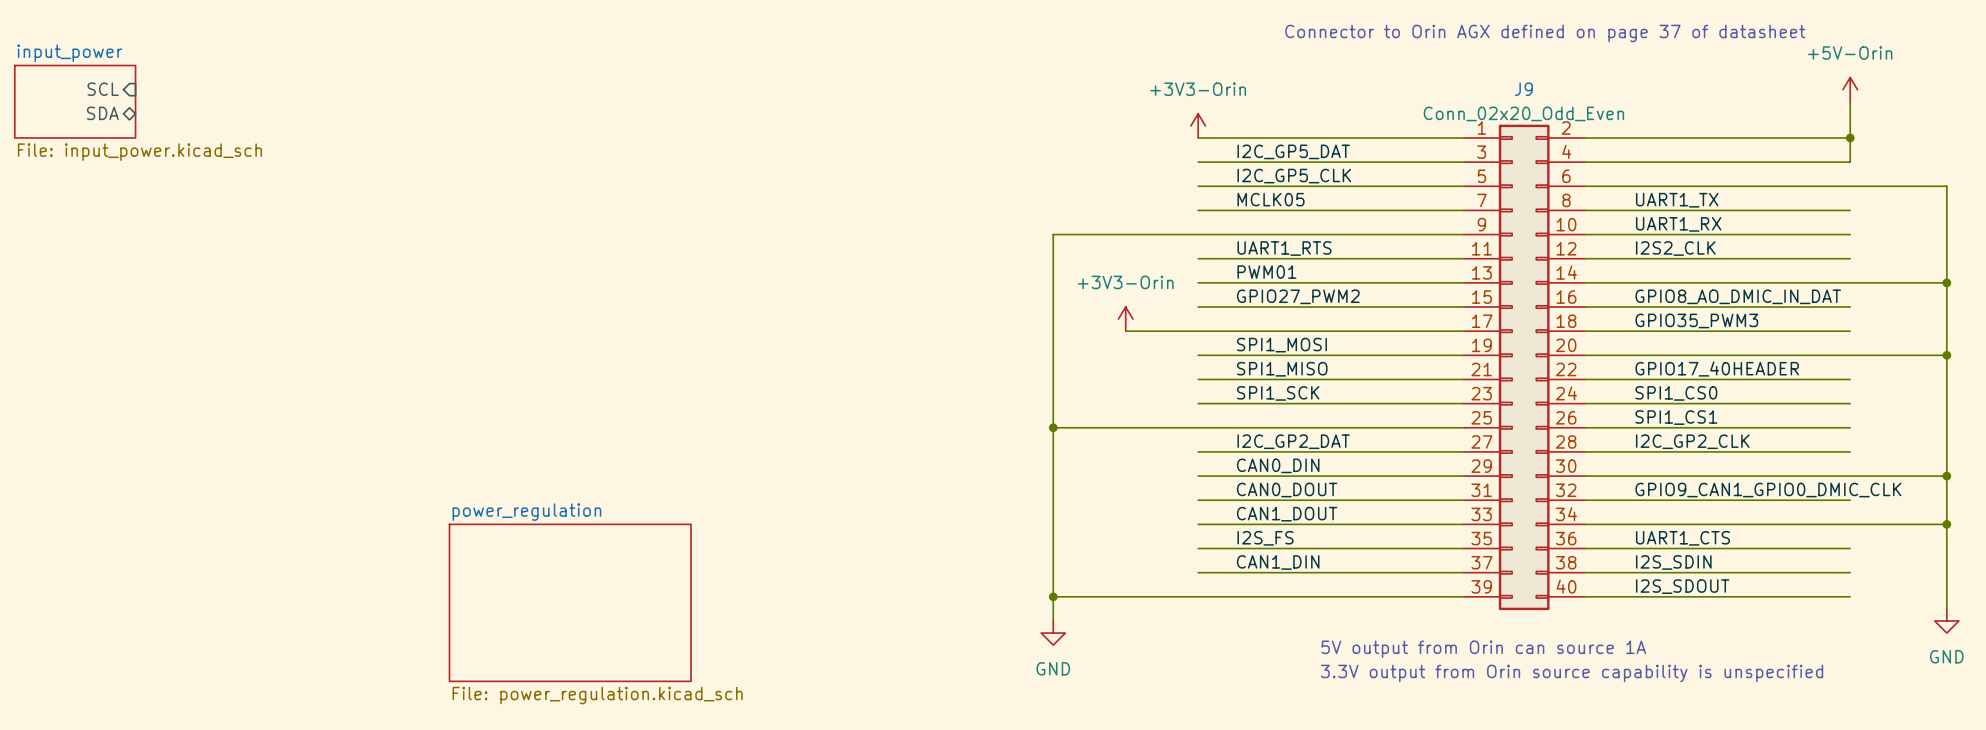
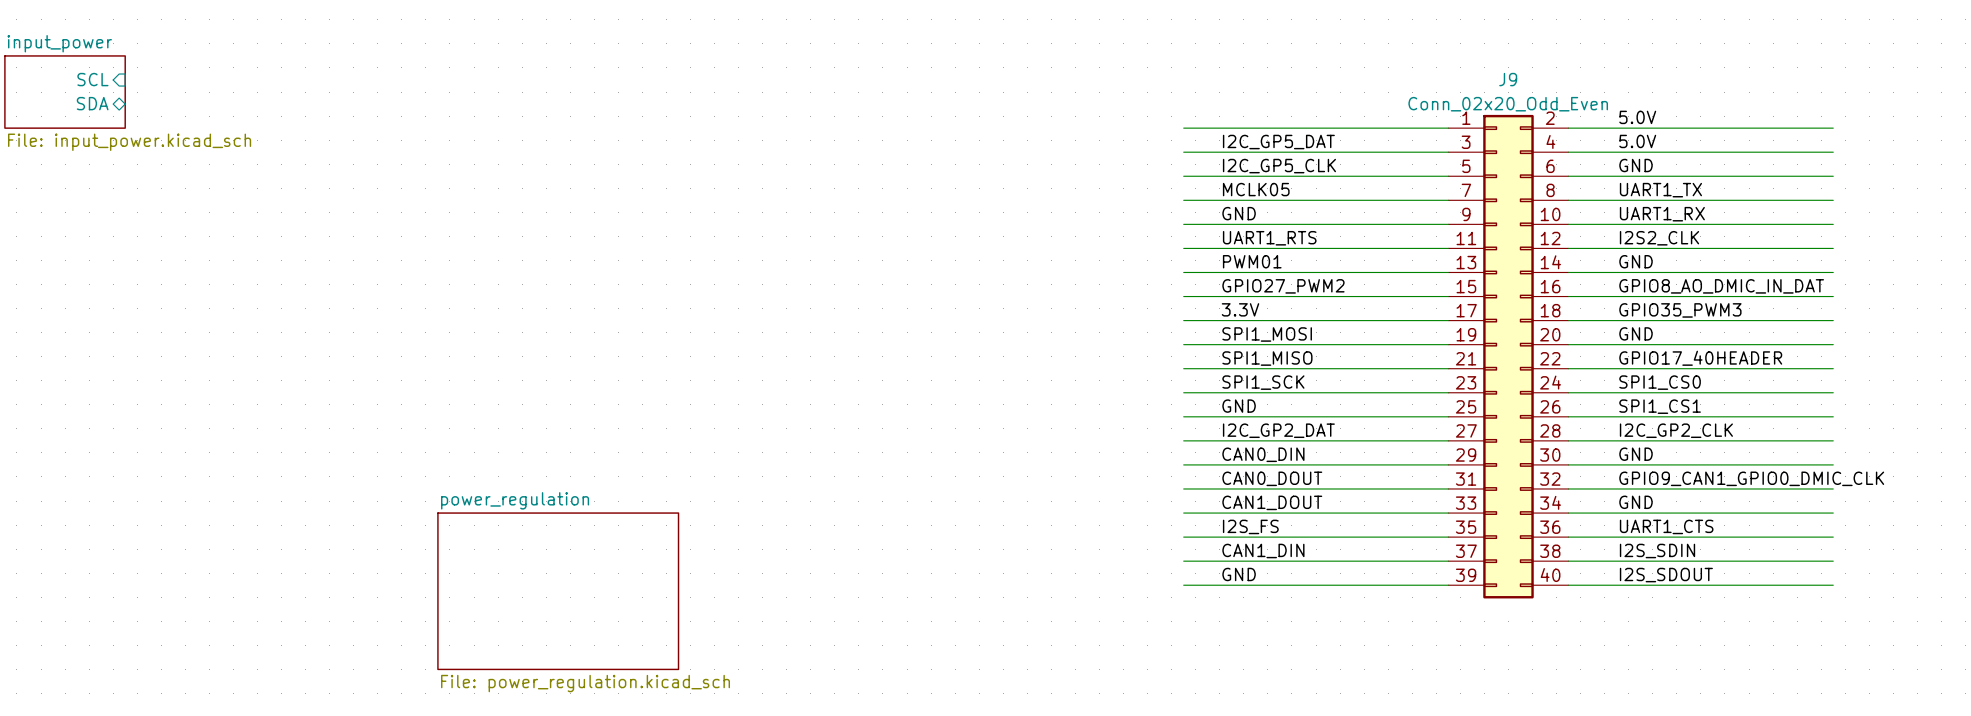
text: Connector to Orin AGX defined on page 37 of datasheet (1545, 33) -> none
power symbol: +5V-Orin (1850, 89) -> none
wire: (1850, 101) (1850, 162) -> none
power symbol: +3V3-Orin (1198, 125) -> none
label: none -> 5.0V (1637, 117)
junction: (1850, 137) -> none
label: none -> 5.0V (1637, 141)
label: none -> GND (1636, 165)
wire: (1850, 186) (1946, 186) (1946, 608) -> none
label: none -> GND (1239, 213)
wire: (1198, 234) (1053, 234) (1053, 620) -> none
label: none -> GND (1636, 261)
wire: (1850, 282) (1946, 282) -> none
junction: (1946, 282) -> none
power symbol: +3V3-Orin (1125, 319) -> none
label: none -> 3.3V (1240, 309)
wire: (1125, 331) (1198, 331) -> none
label: none -> GND (1636, 333)
wire: (1850, 355) (1946, 355) -> none
junction: (1946, 355) -> none
label: none -> GND (1239, 406)
wire: (1053, 427) (1198, 427) -> none
junction: (1053, 427) -> none
label: none -> GND (1636, 454)
wire: (1850, 476) (1946, 476) -> none
junction: (1946, 476) -> none
label: none -> GND (1636, 502)
wire: (1850, 524) (1946, 524) -> none
junction: (1946, 524) -> none
label: none -> GND (1239, 574)
wire: (1053, 596) (1198, 596) -> none
junction: (1053, 596) -> none
power symbol: GND (1946, 620) -> none
power symbol: GND (1053, 633) -> none
text: 5V output from Orin can source 1A (1483, 649) -> none
text: 3.3V output from Orin source capability is unspecified (1572, 673) -> none

